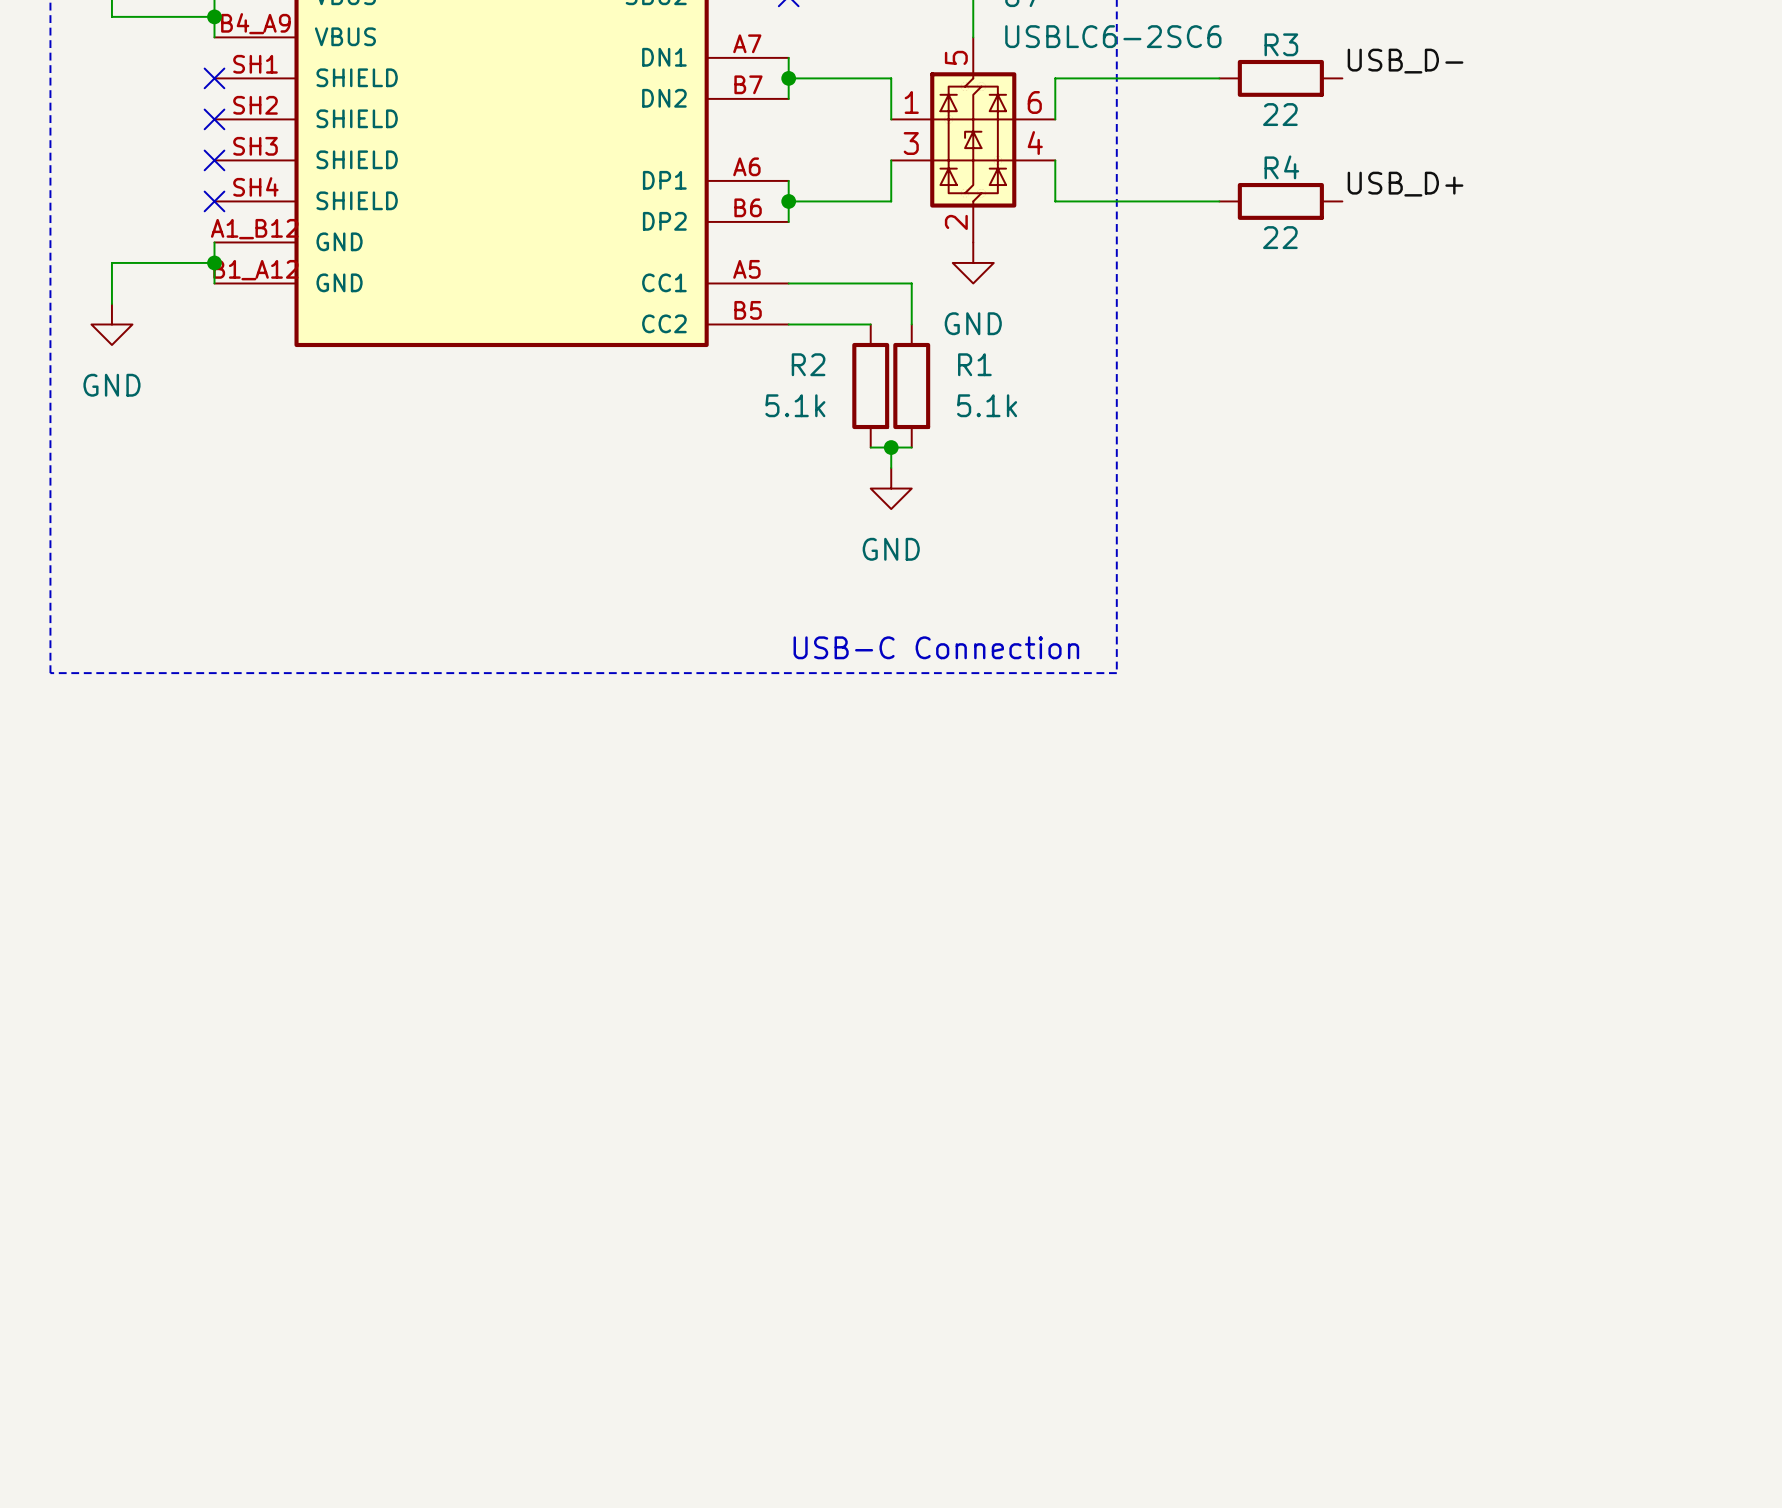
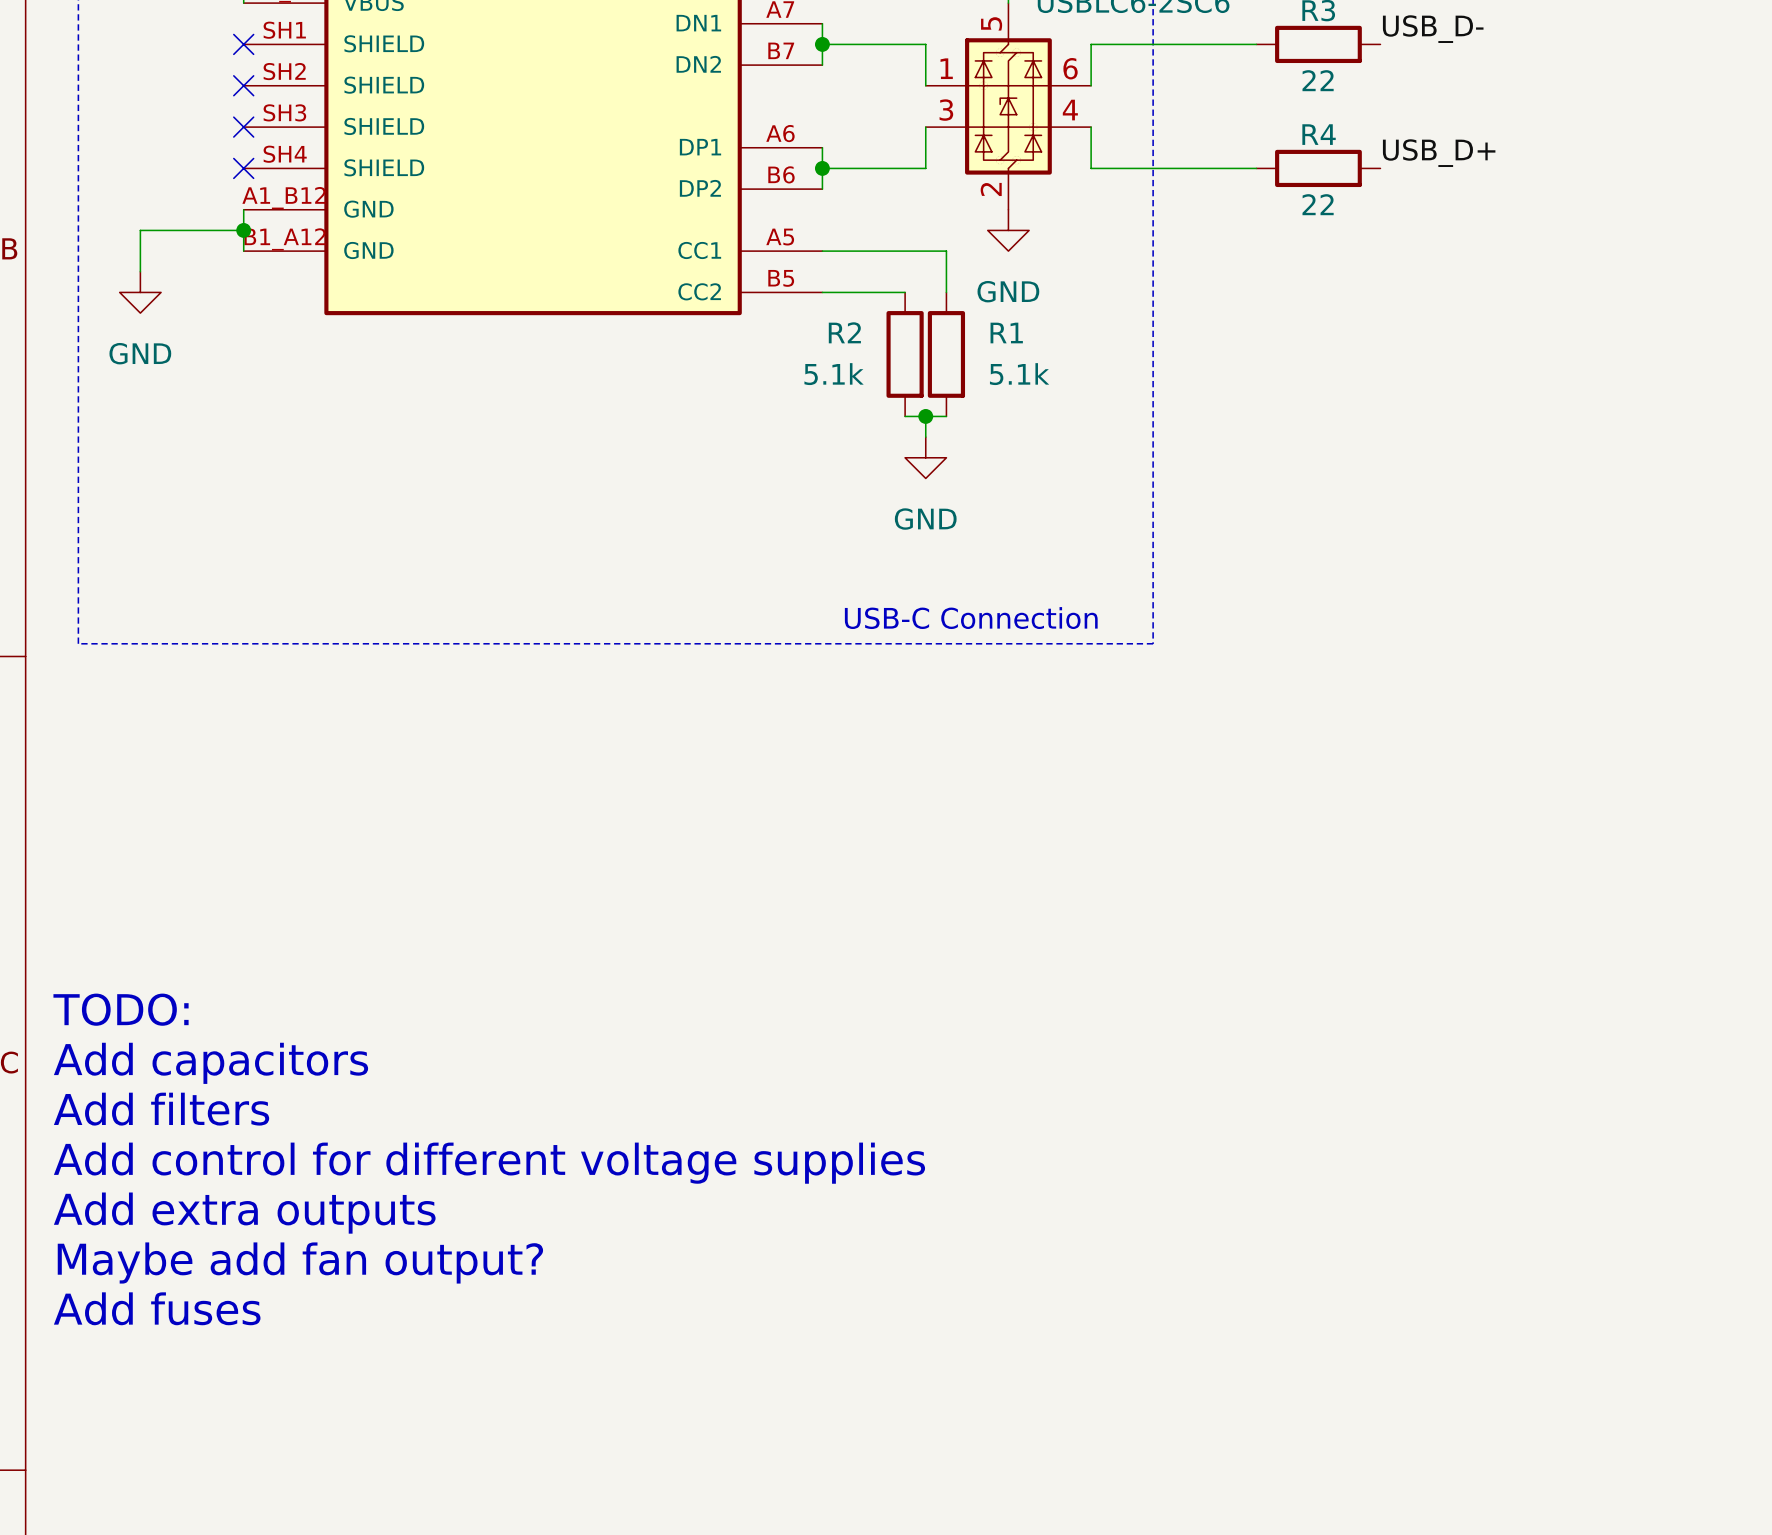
text: none -> TODO: (121, 1009)
text: none -> Add capacitors (211, 1063)
text: none -> Add filters (161, 1109)
text: none -> Add control for different voltage supplies (489, 1163)
text: none -> Add extra outputs (244, 1213)
text: none -> Maybe add fan output? (300, 1262)
text: none -> Add fuses (157, 1308)

